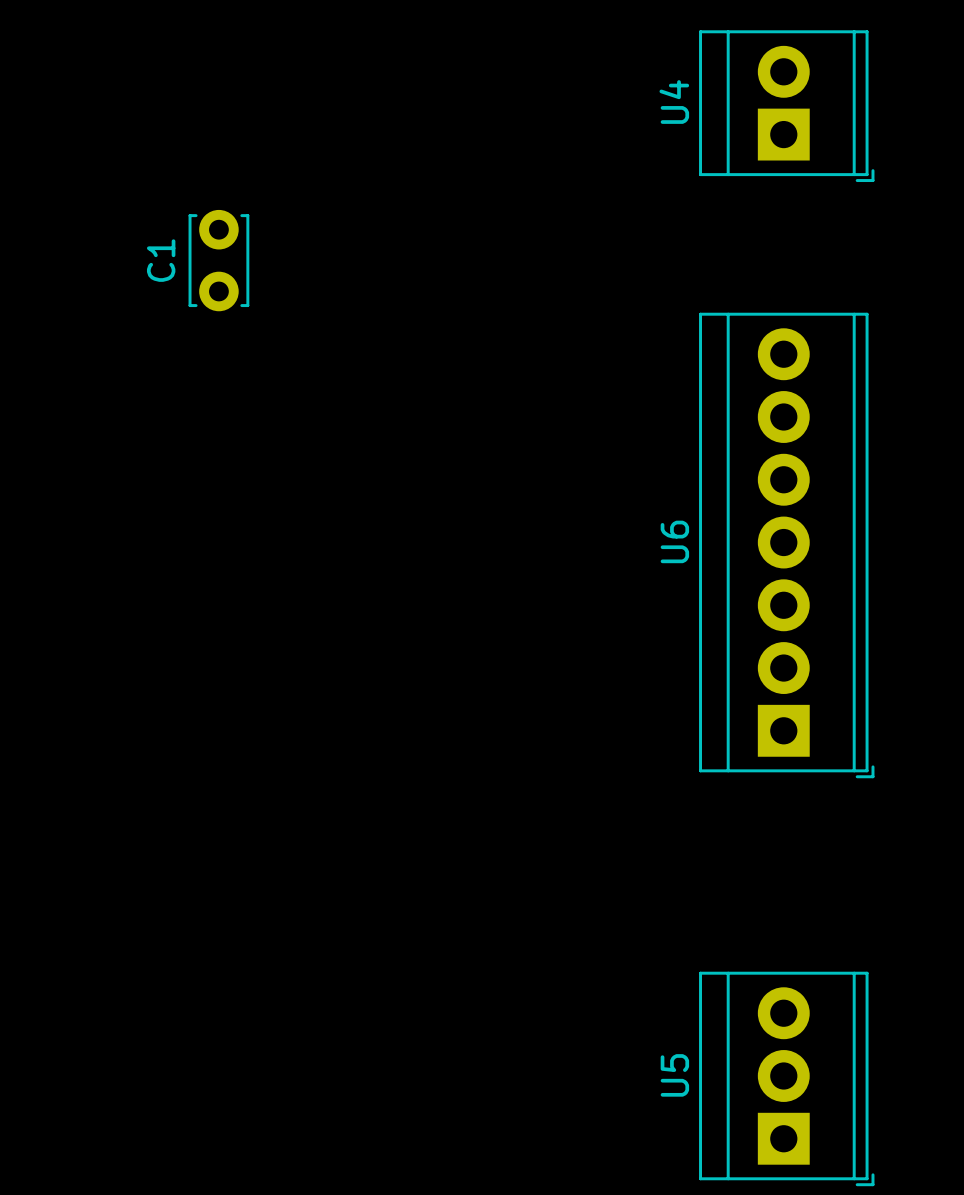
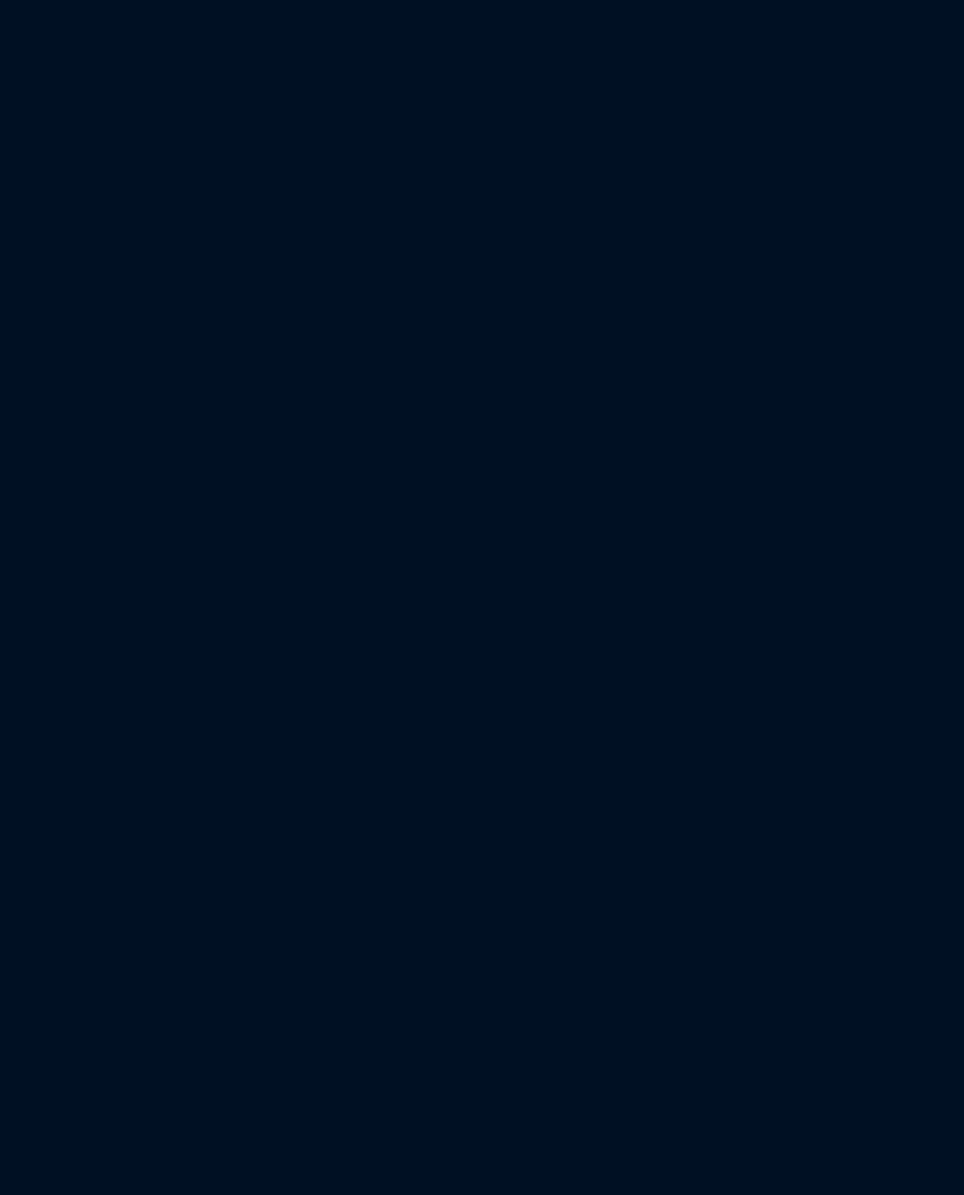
U4: (786, 106) -> none
C1: (218, 260) -> none
U6: (786, 545) -> none
U5: (786, 1078) -> none

